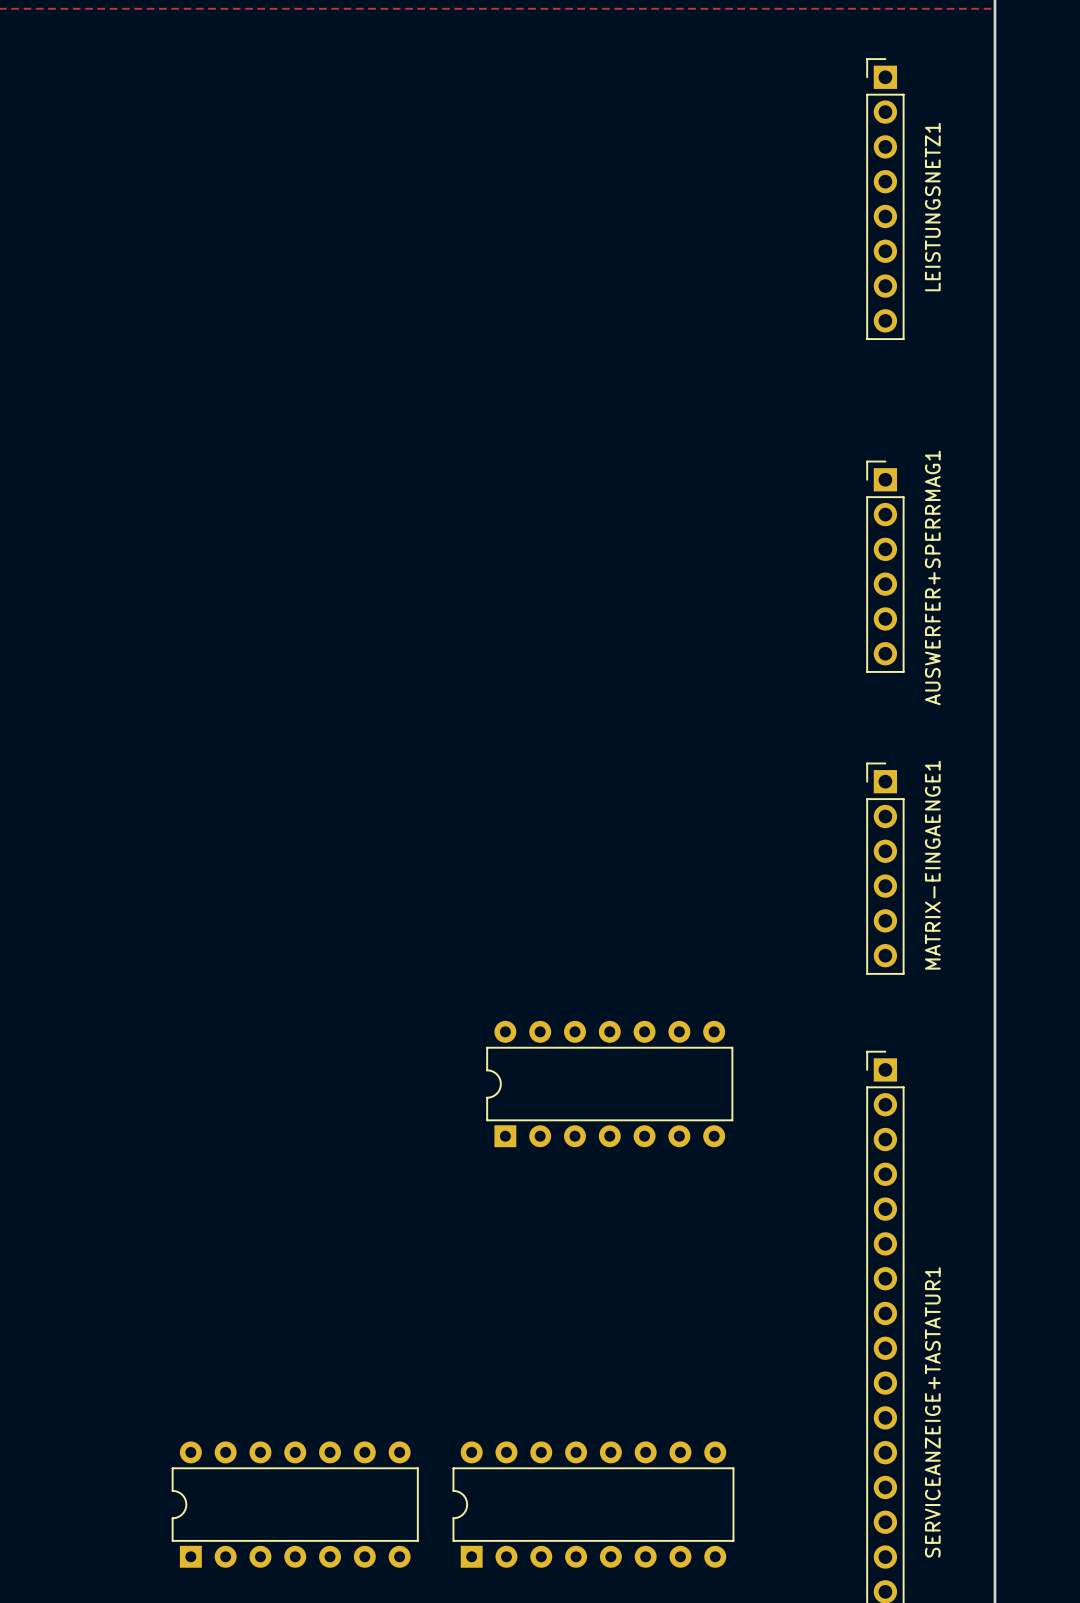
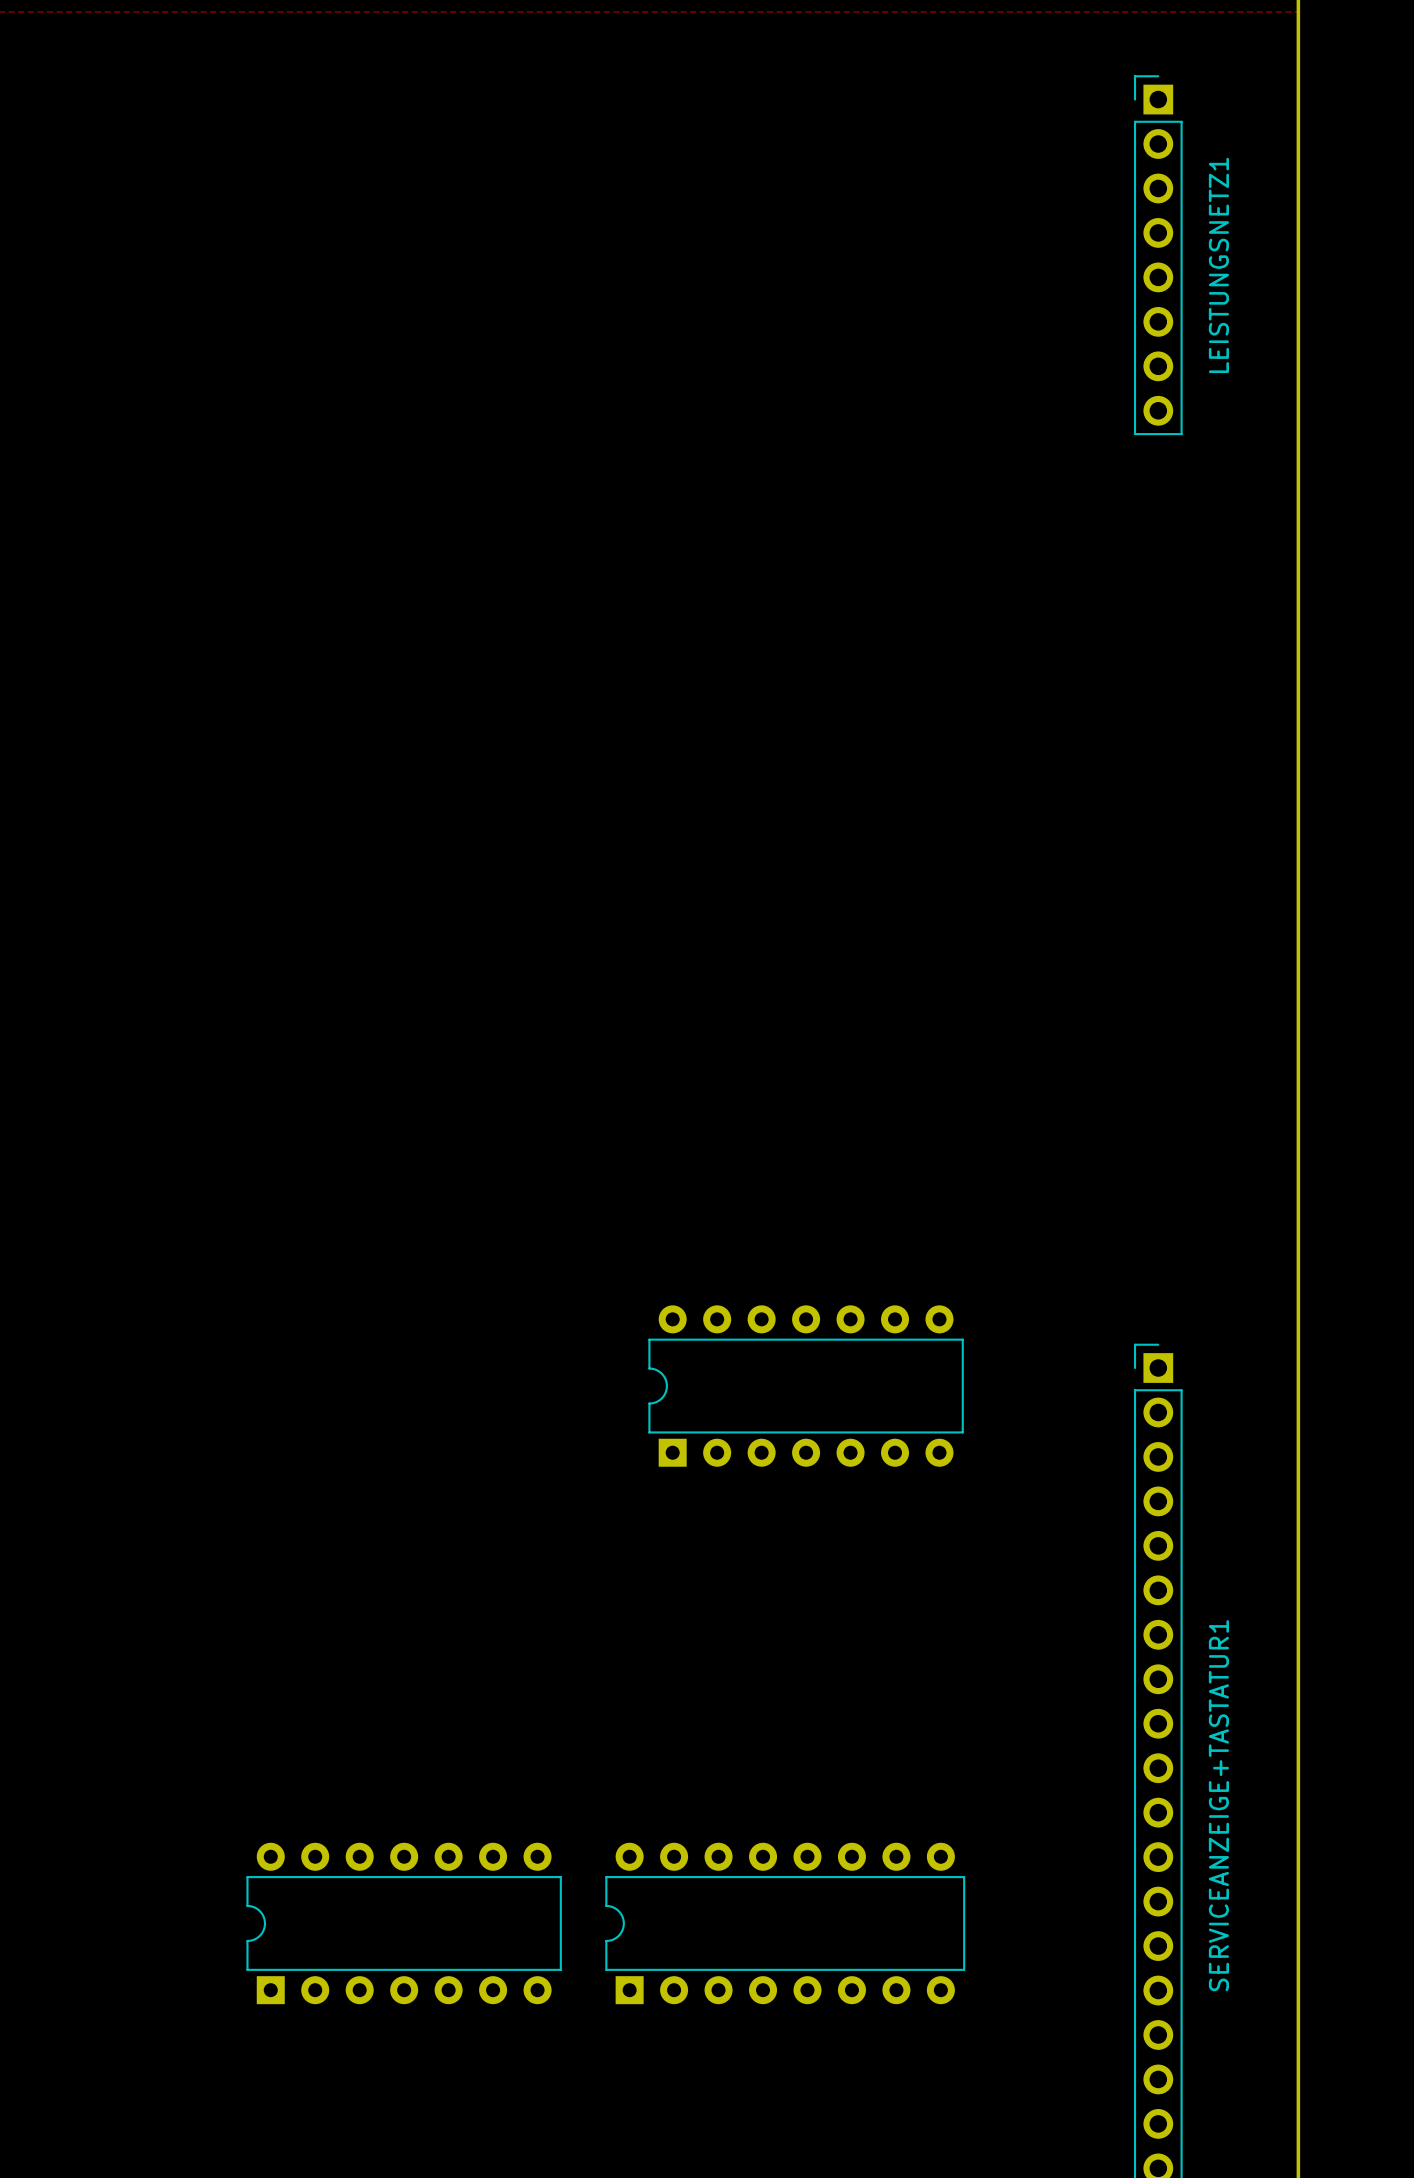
AUSWERFER+SPERRMAG1: (885, 566) -> none
MATRIX-EINGAENGE1: (885, 868) -> none

